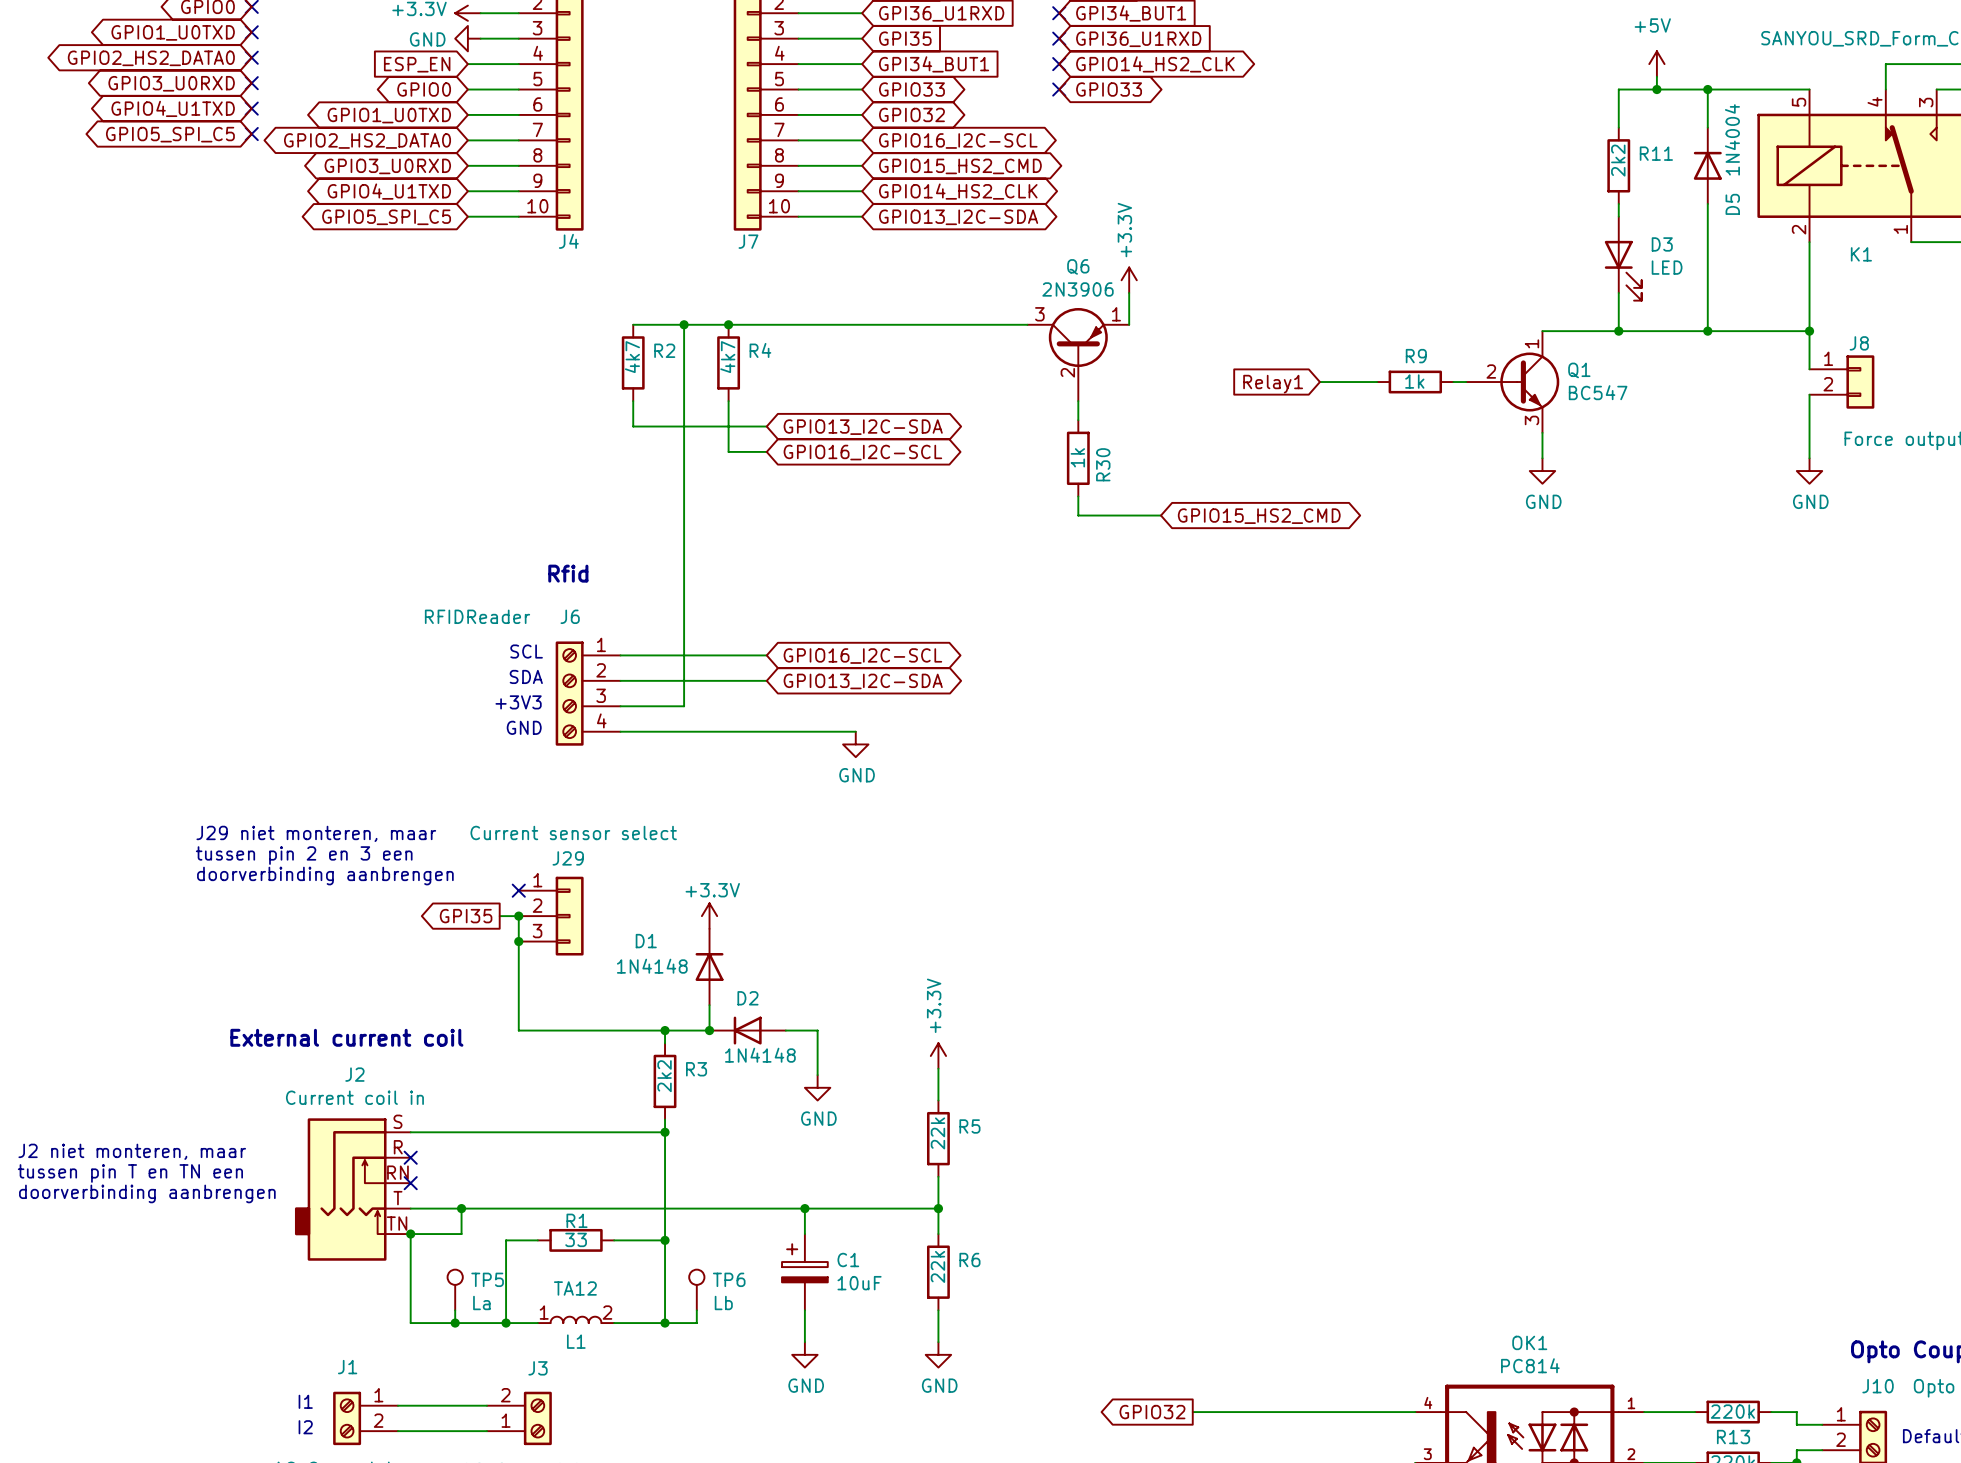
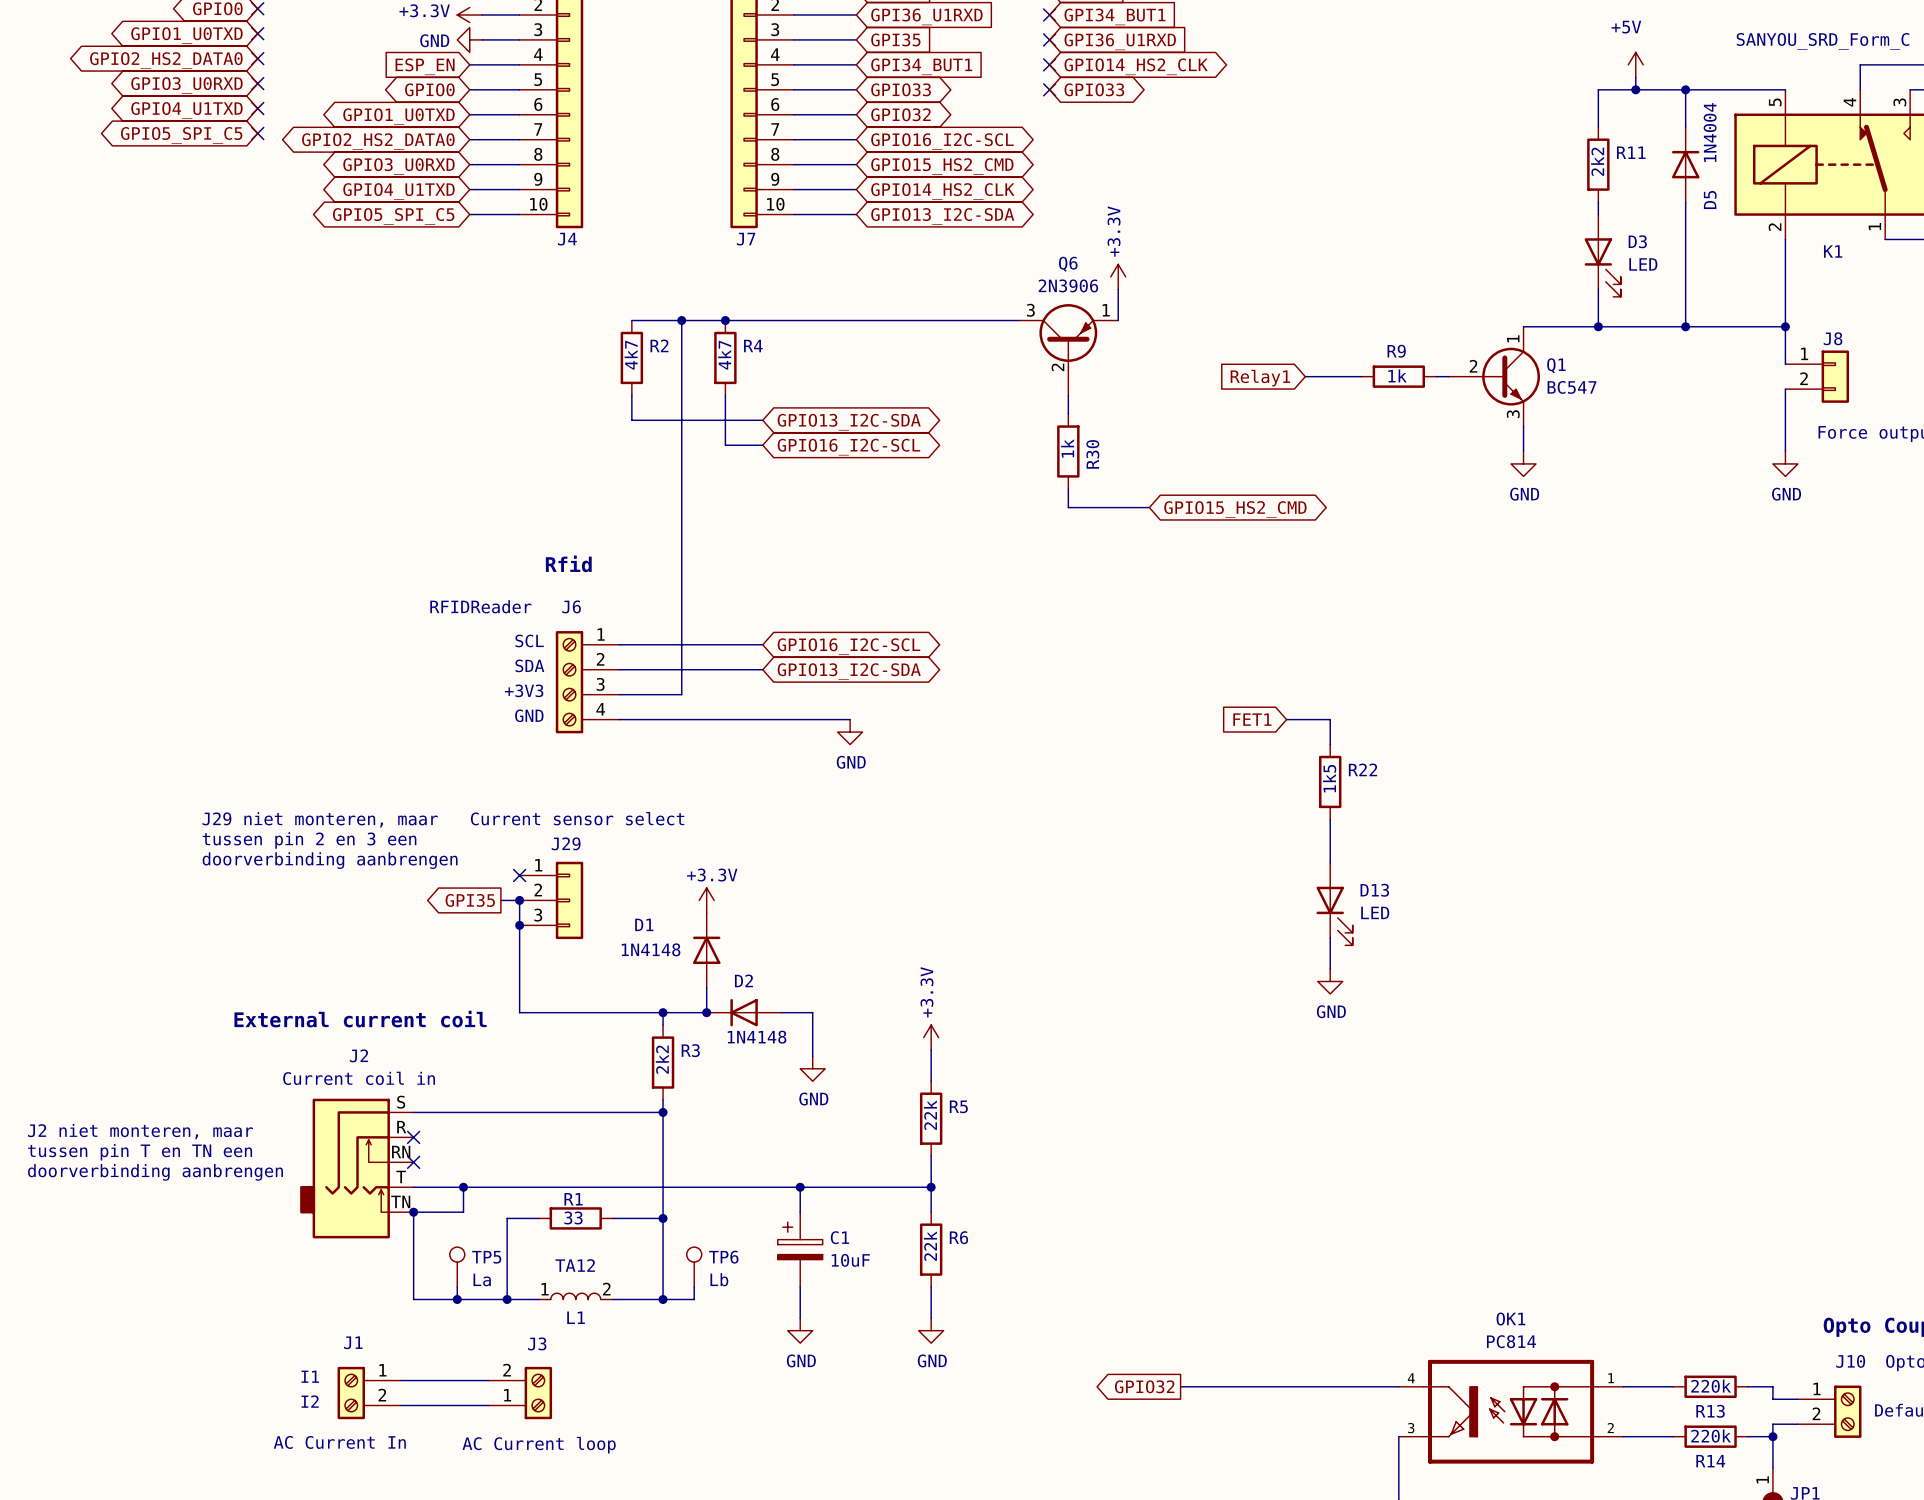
global label: none -> FET1 (1252, 719)
wire: none -> (1286, 719) (1330, 719) (1330, 744)
R22: none -> 1k5 (1330, 781)
wire: none -> (1330, 819) (1330, 863)
D13: none -> LED (1334, 904)
wire: none -> (1330, 937) (1330, 969)
power symbol: none -> GND (1330, 981)

